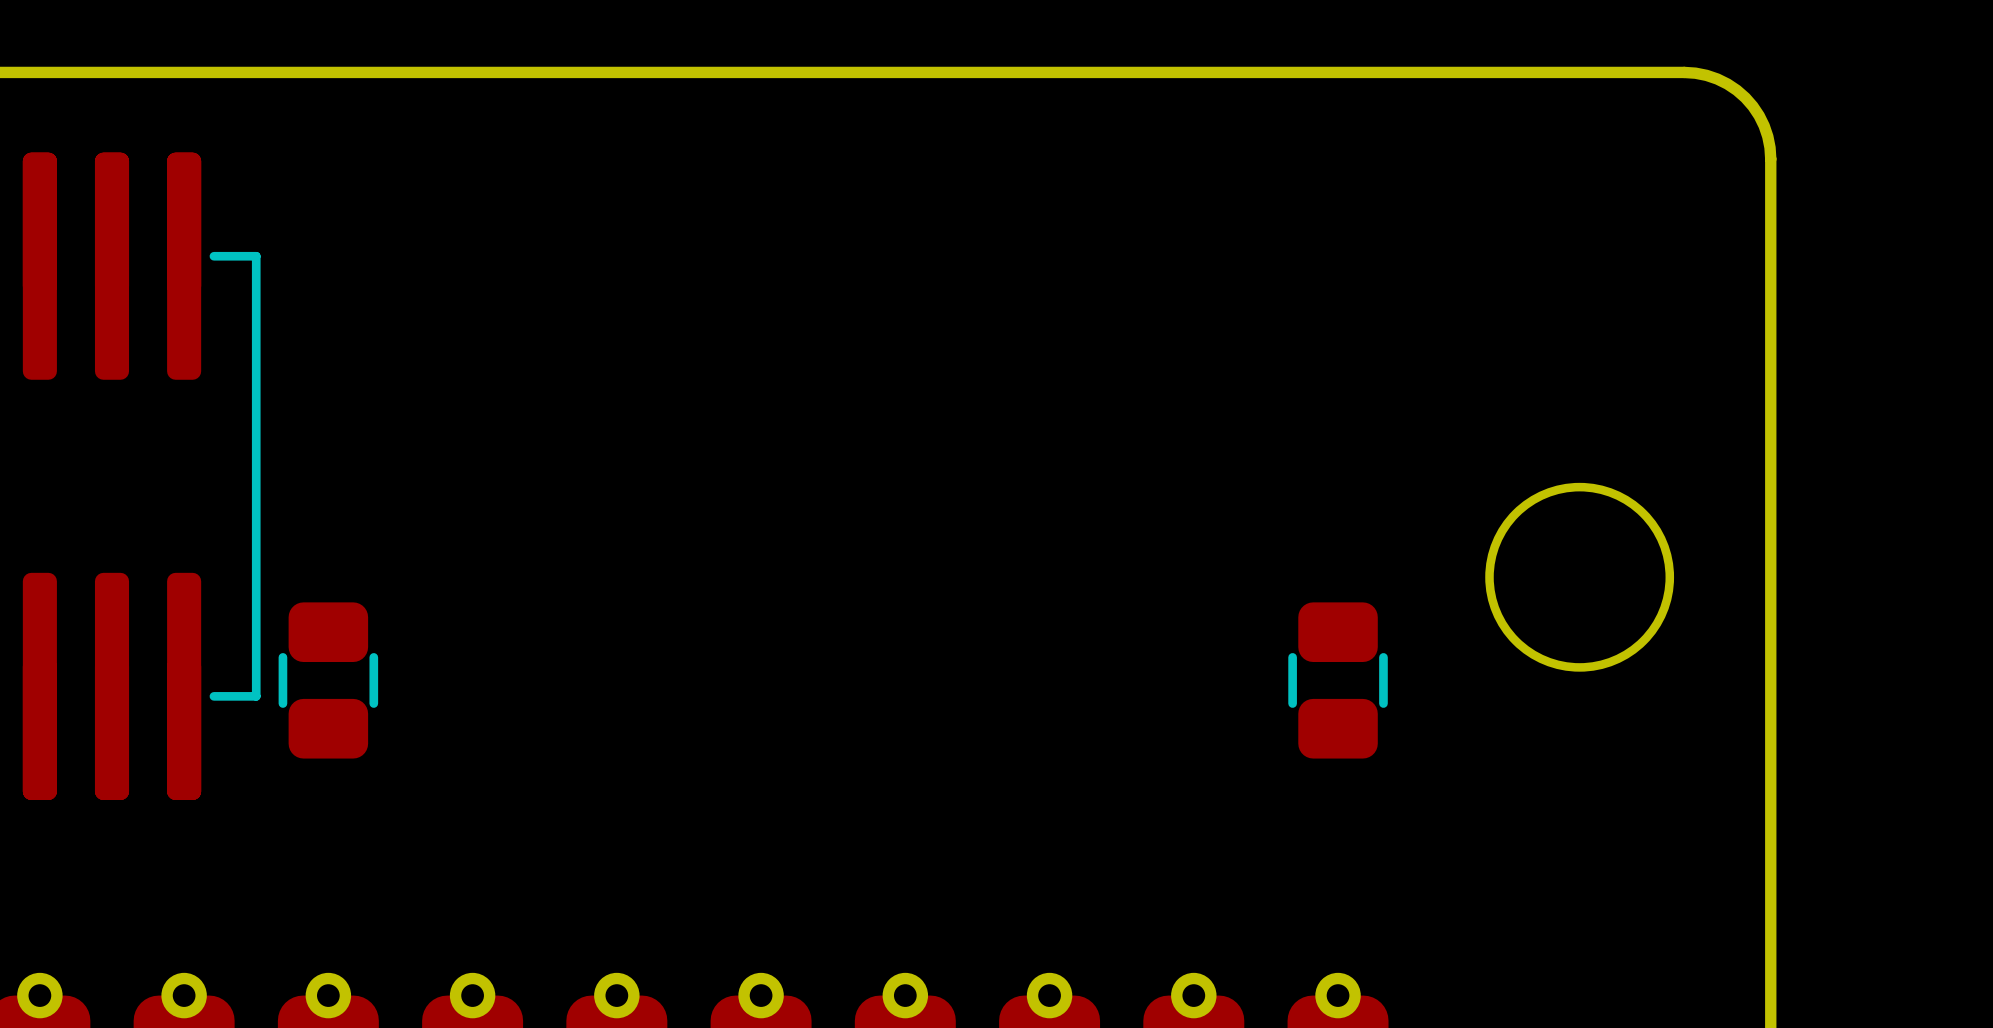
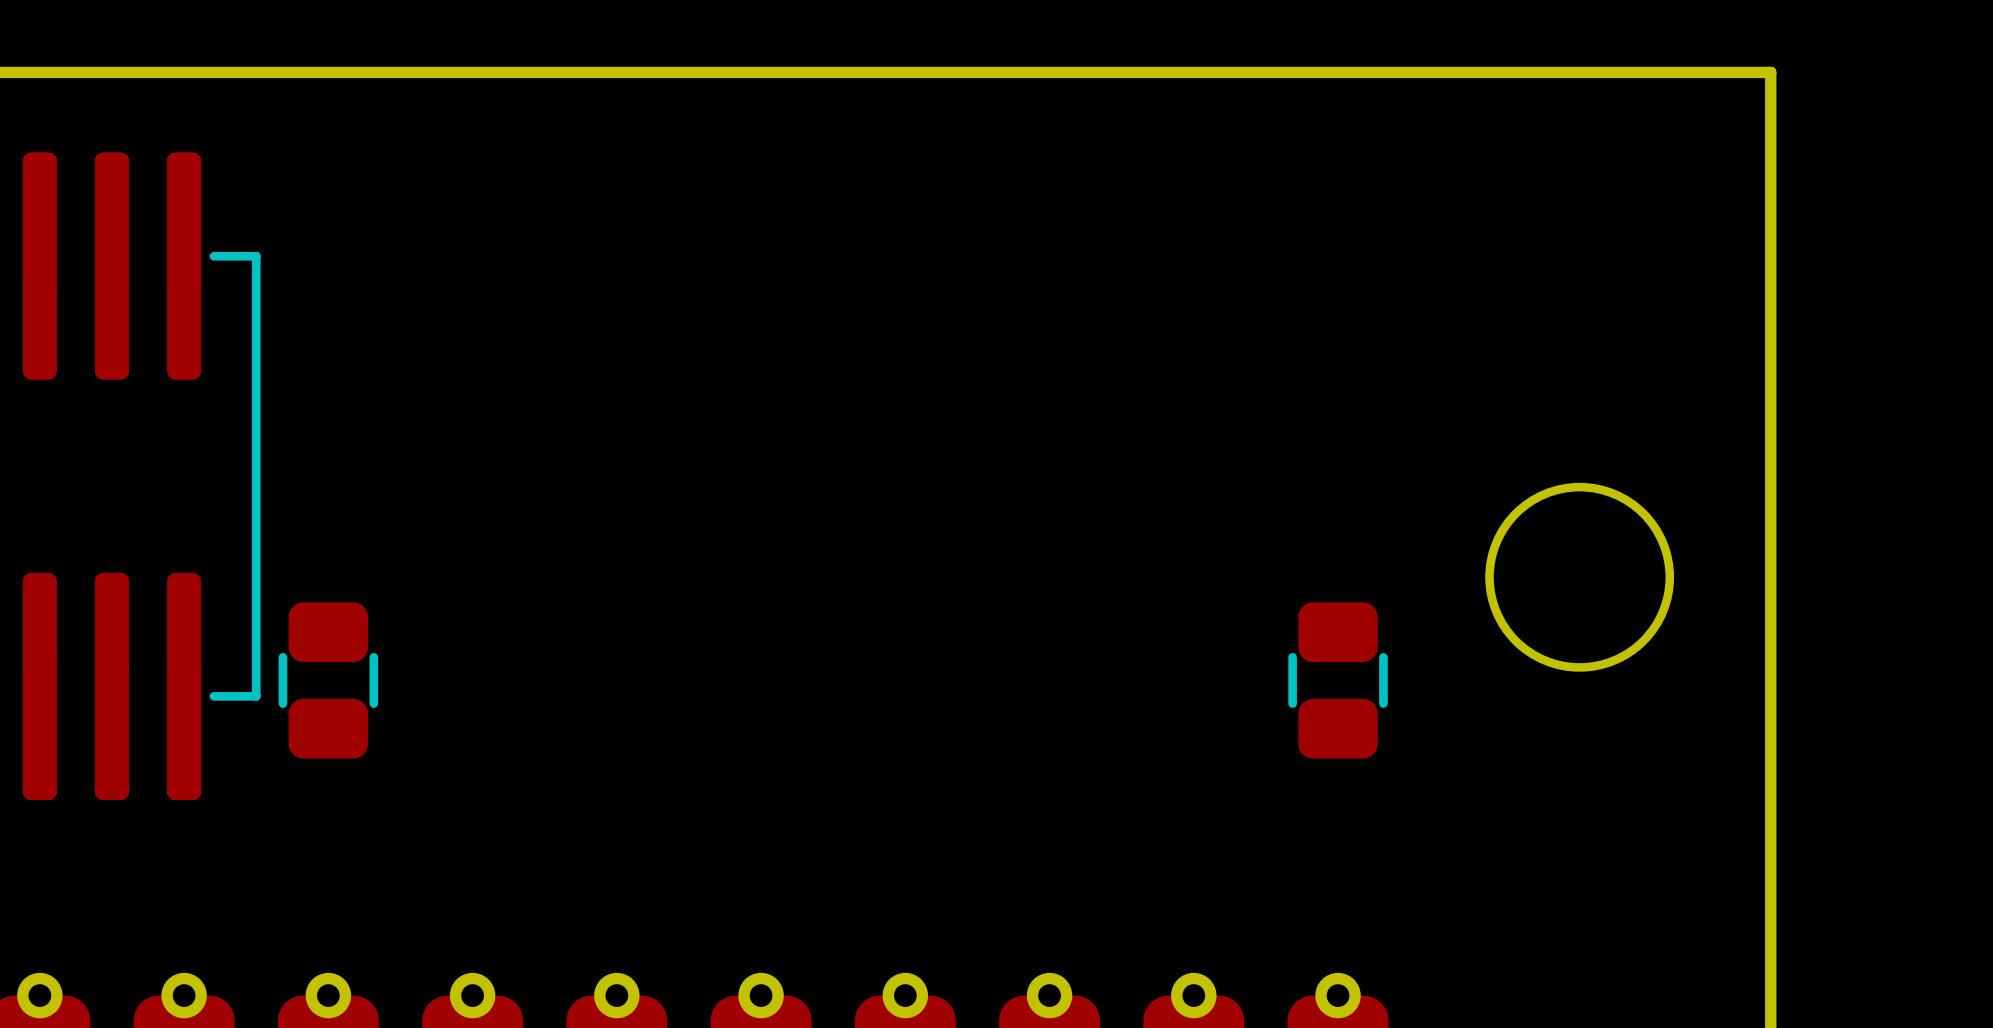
board edge: (1684, 72) (1717, 79) (1745, 97) (1764, 125) (1770, 158) -> (1684, 72) (1770, 72) (1770, 158)

